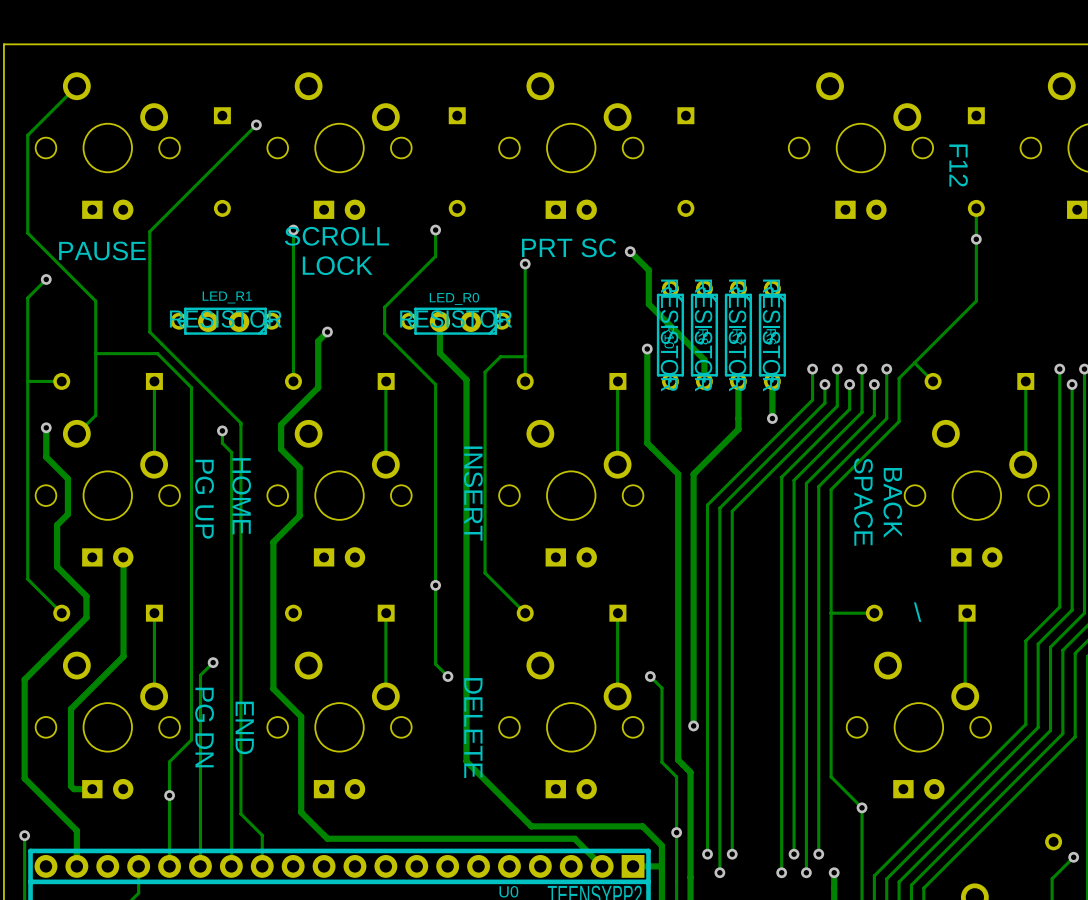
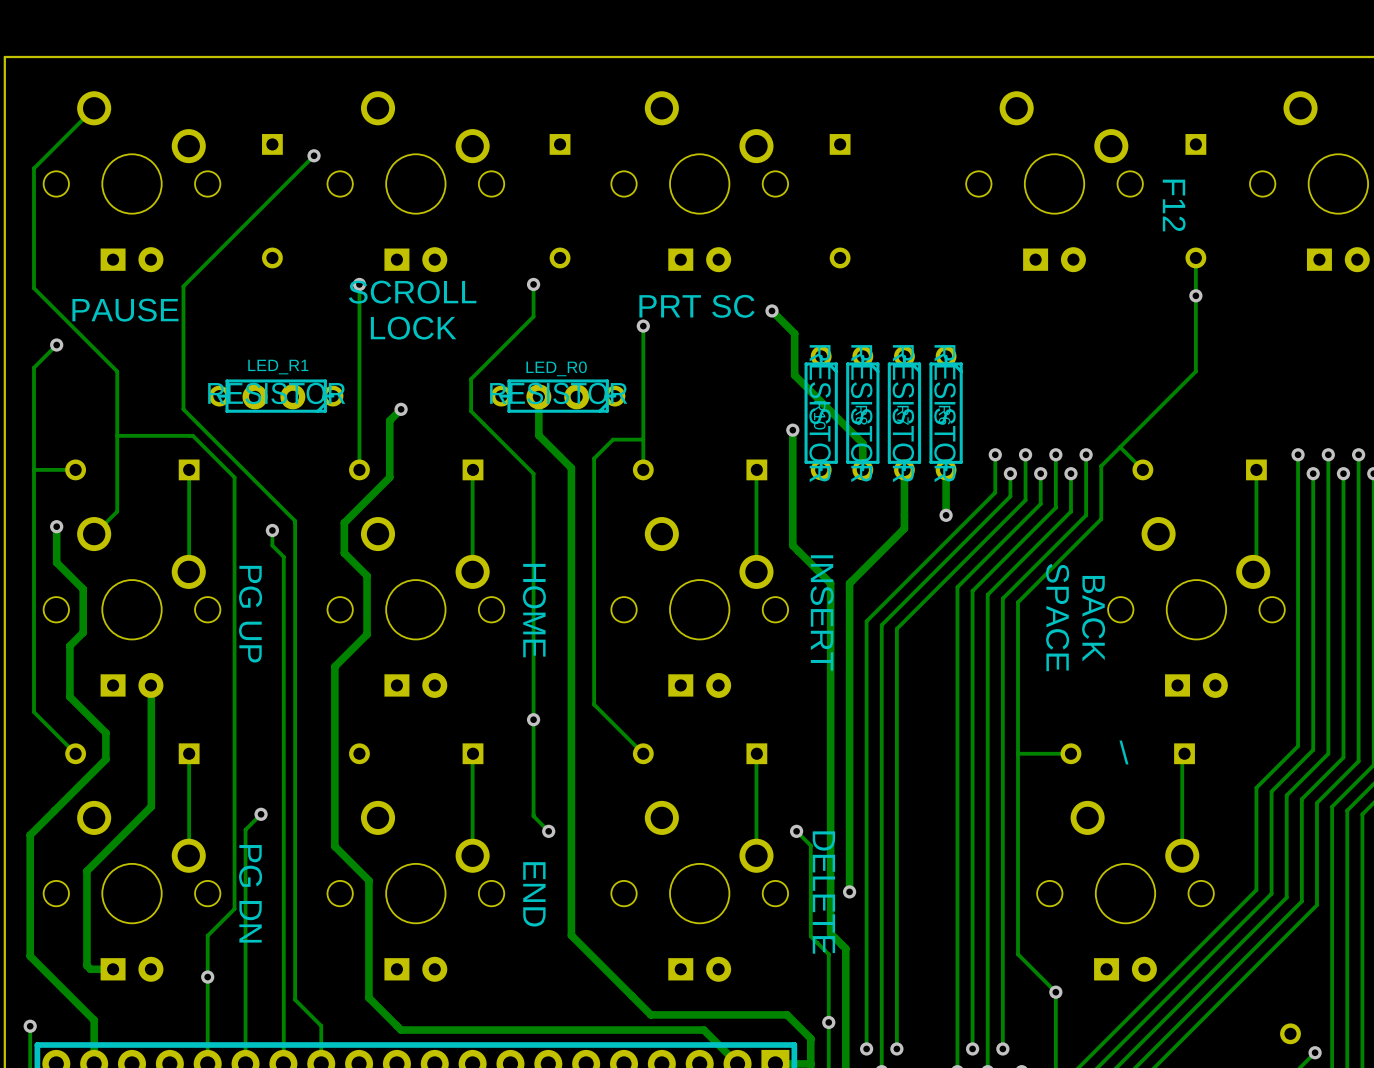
text position: INSERT (473, 493) -> INSERT (822, 612)
text position: HOME (241, 496) -> HOME (534, 610)
text position: END (244, 727) -> END (534, 894)
text position: DELETE (473, 728) -> DELETE (823, 892)

